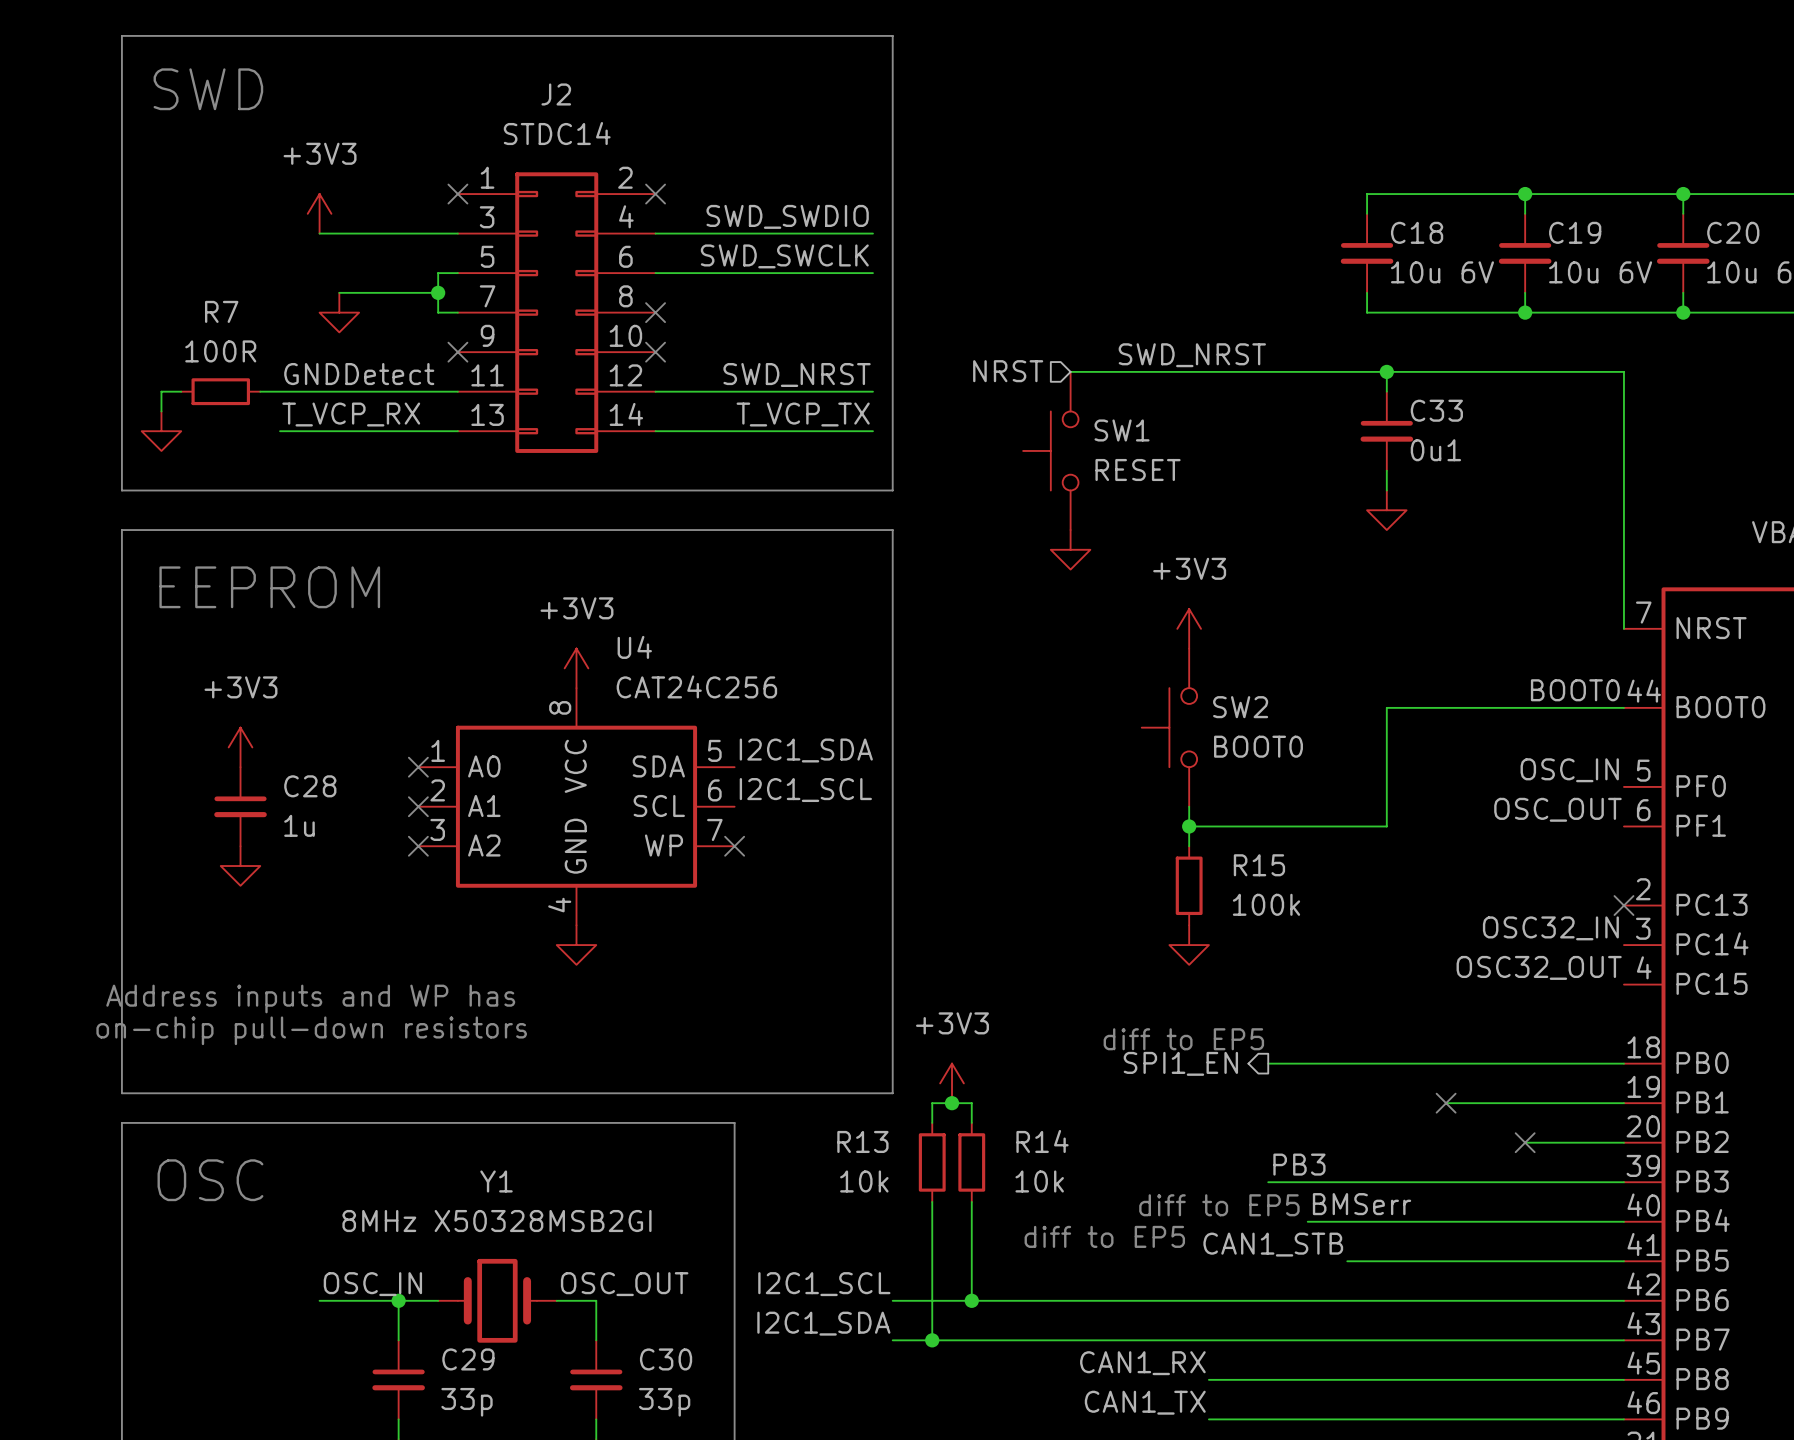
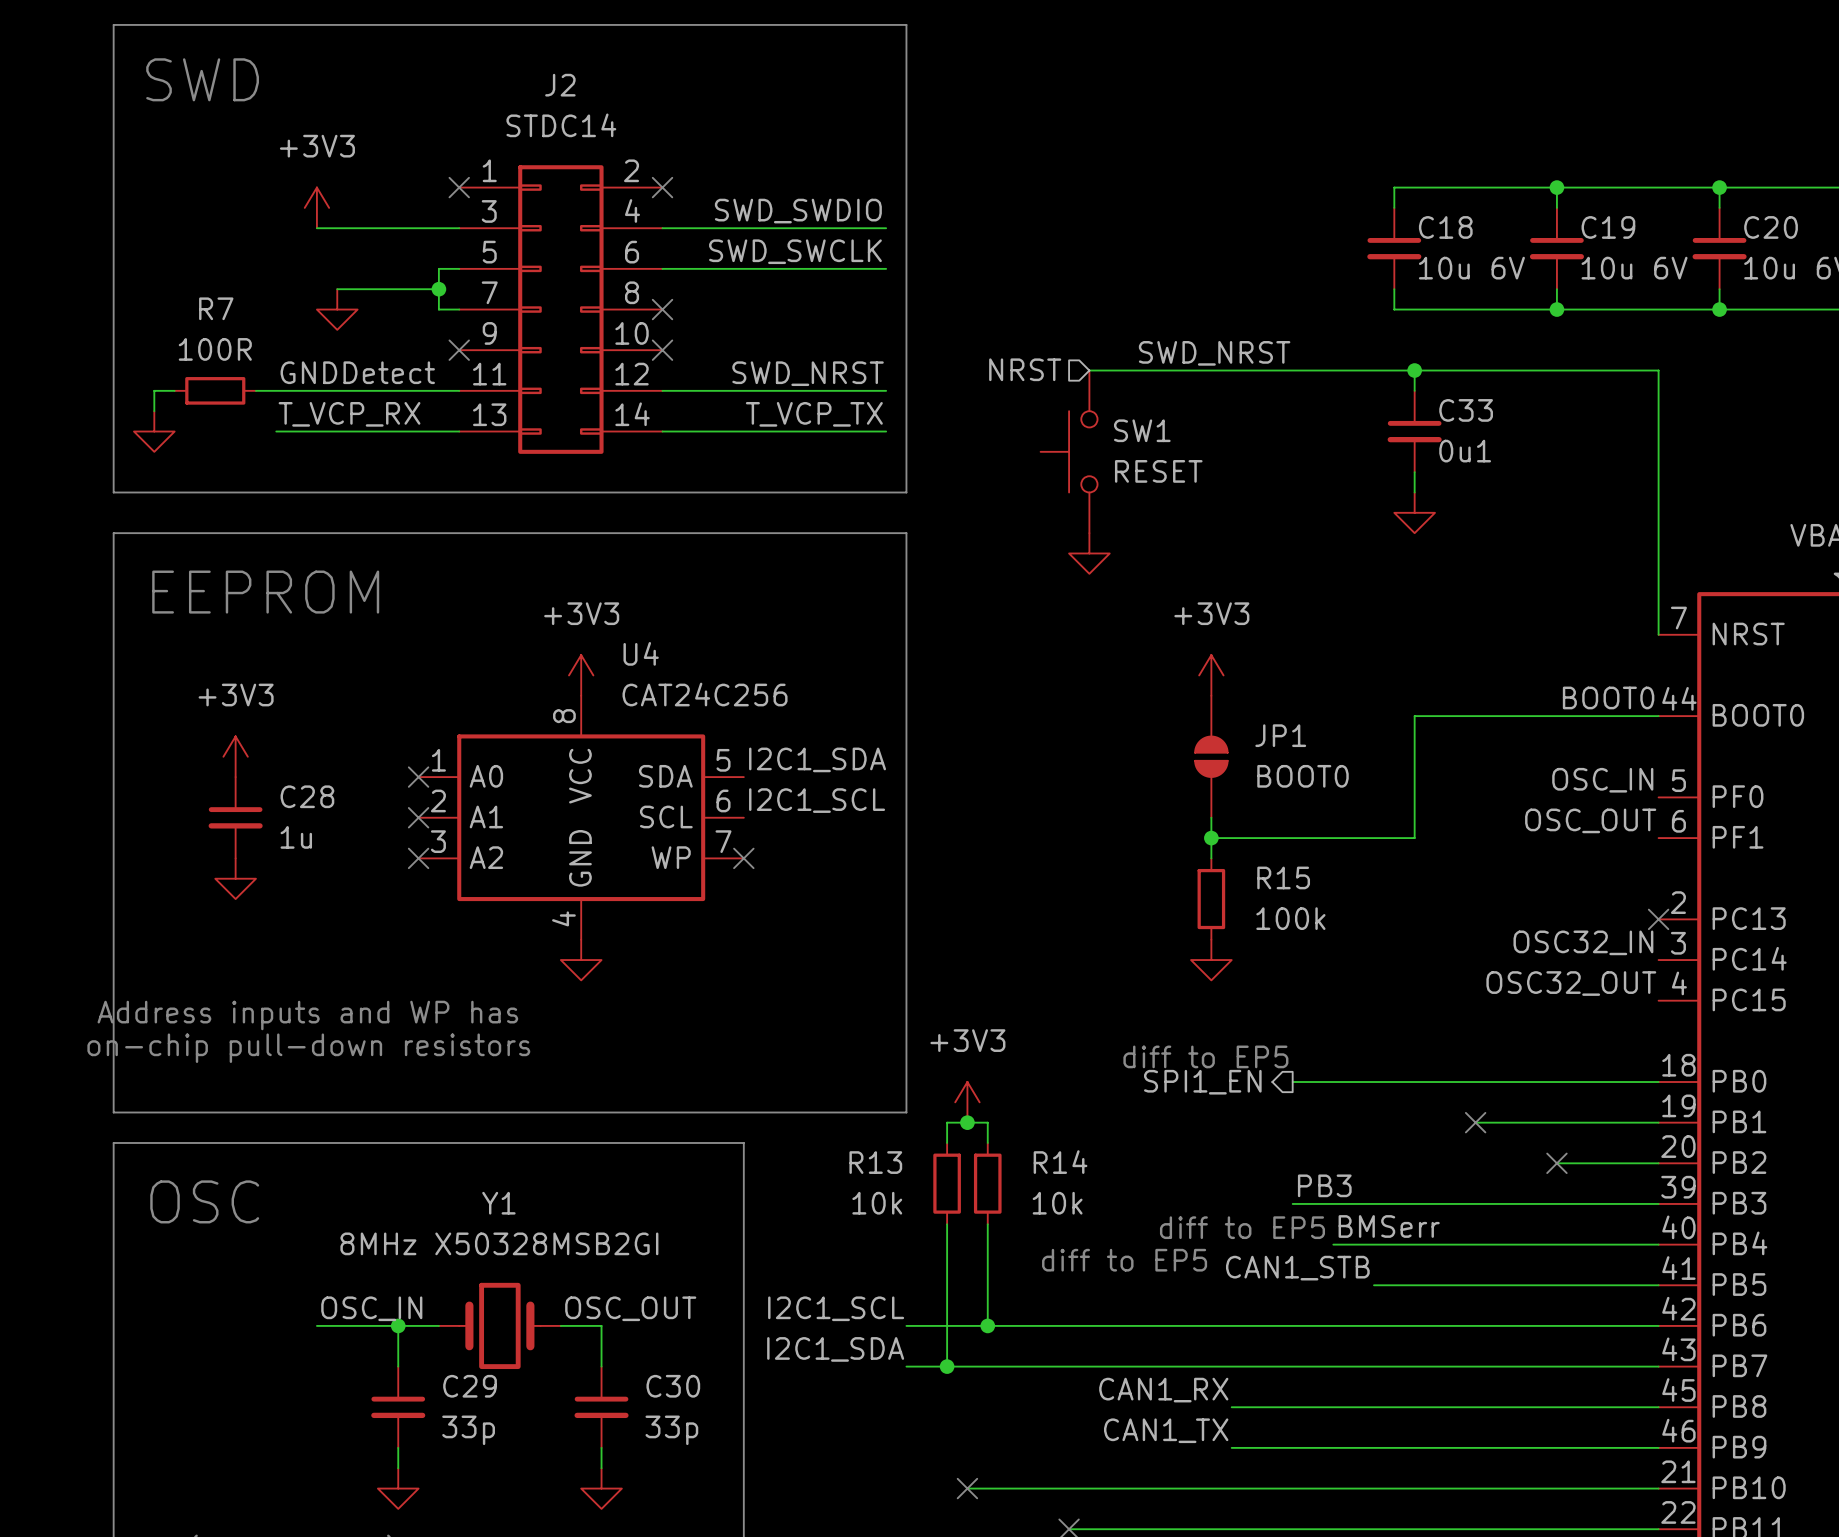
power symbol position: +3V3 (1189, 628) -> +3V3 (1211, 675)
SW2: BOOT0 (1169, 727) -> none
JP1: none -> BOOT0 (1211, 756)

